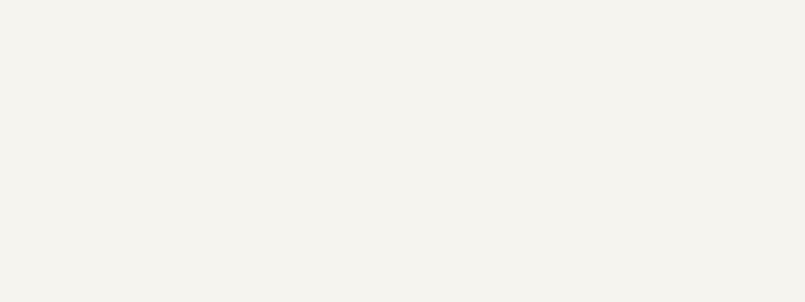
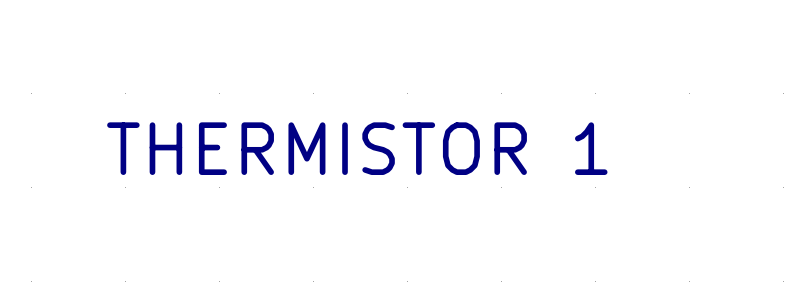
text: none -> THERMISTOR 1 (357, 148)

